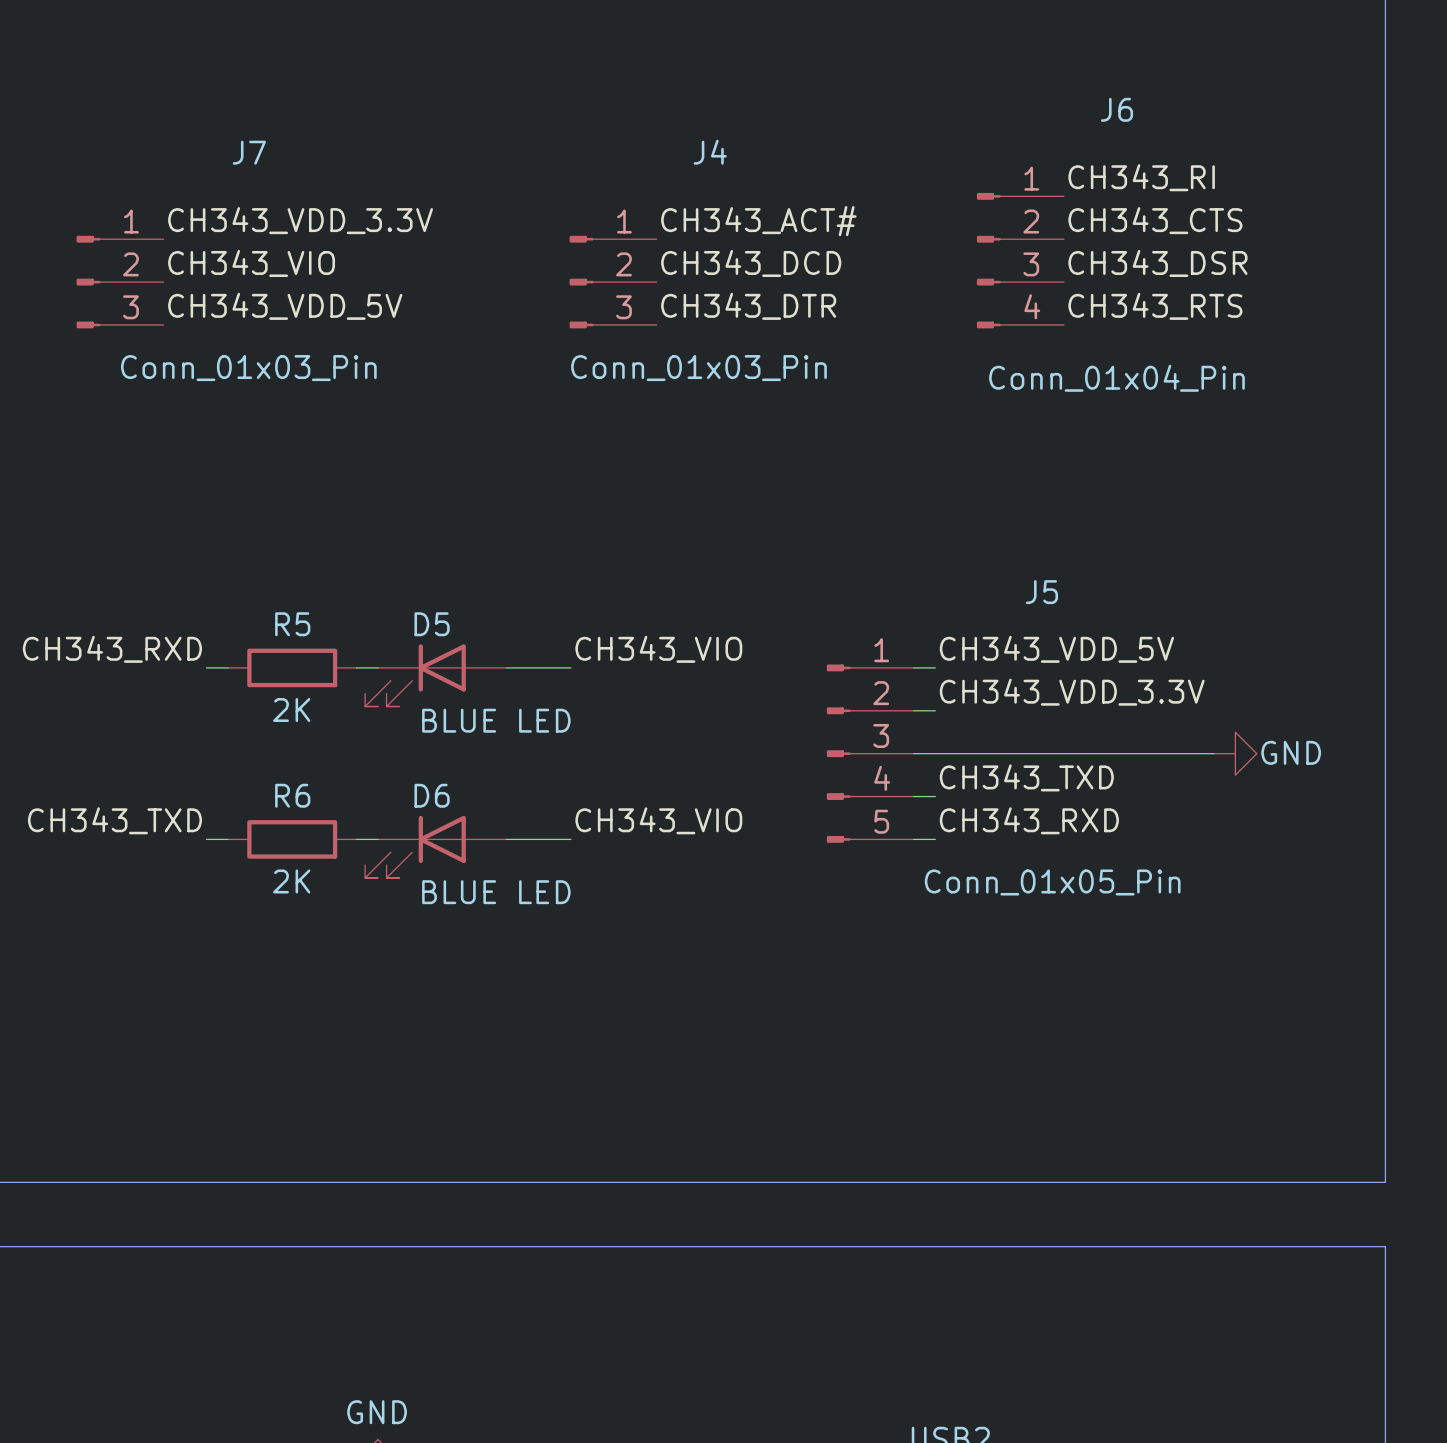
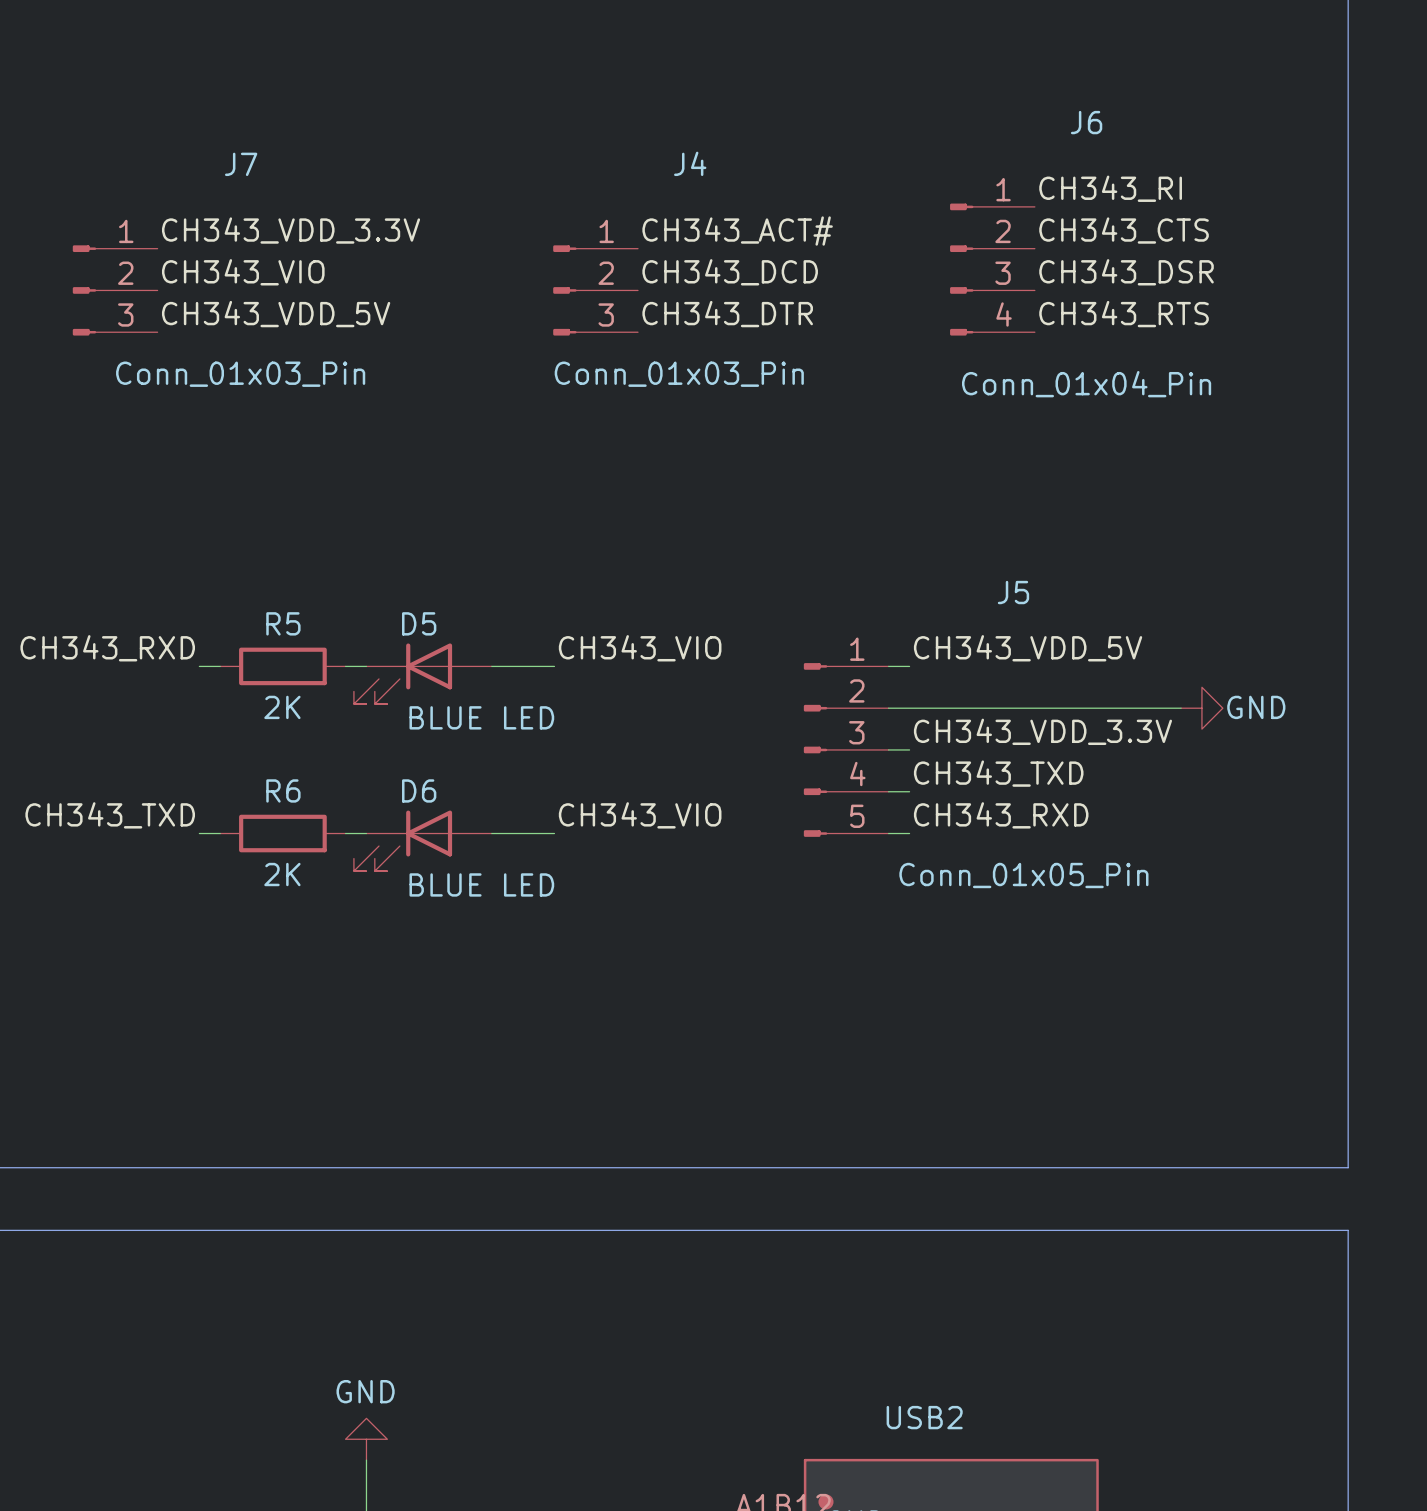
label position: CH343_VDD_3.3V (1072, 692) -> CH343_VDD_3.3V (1042, 731)
wire: (935, 753) (1213, 753) -> (909, 708) (1181, 708)
power symbol position: GND (1235, 753) -> GND (1201, 708)

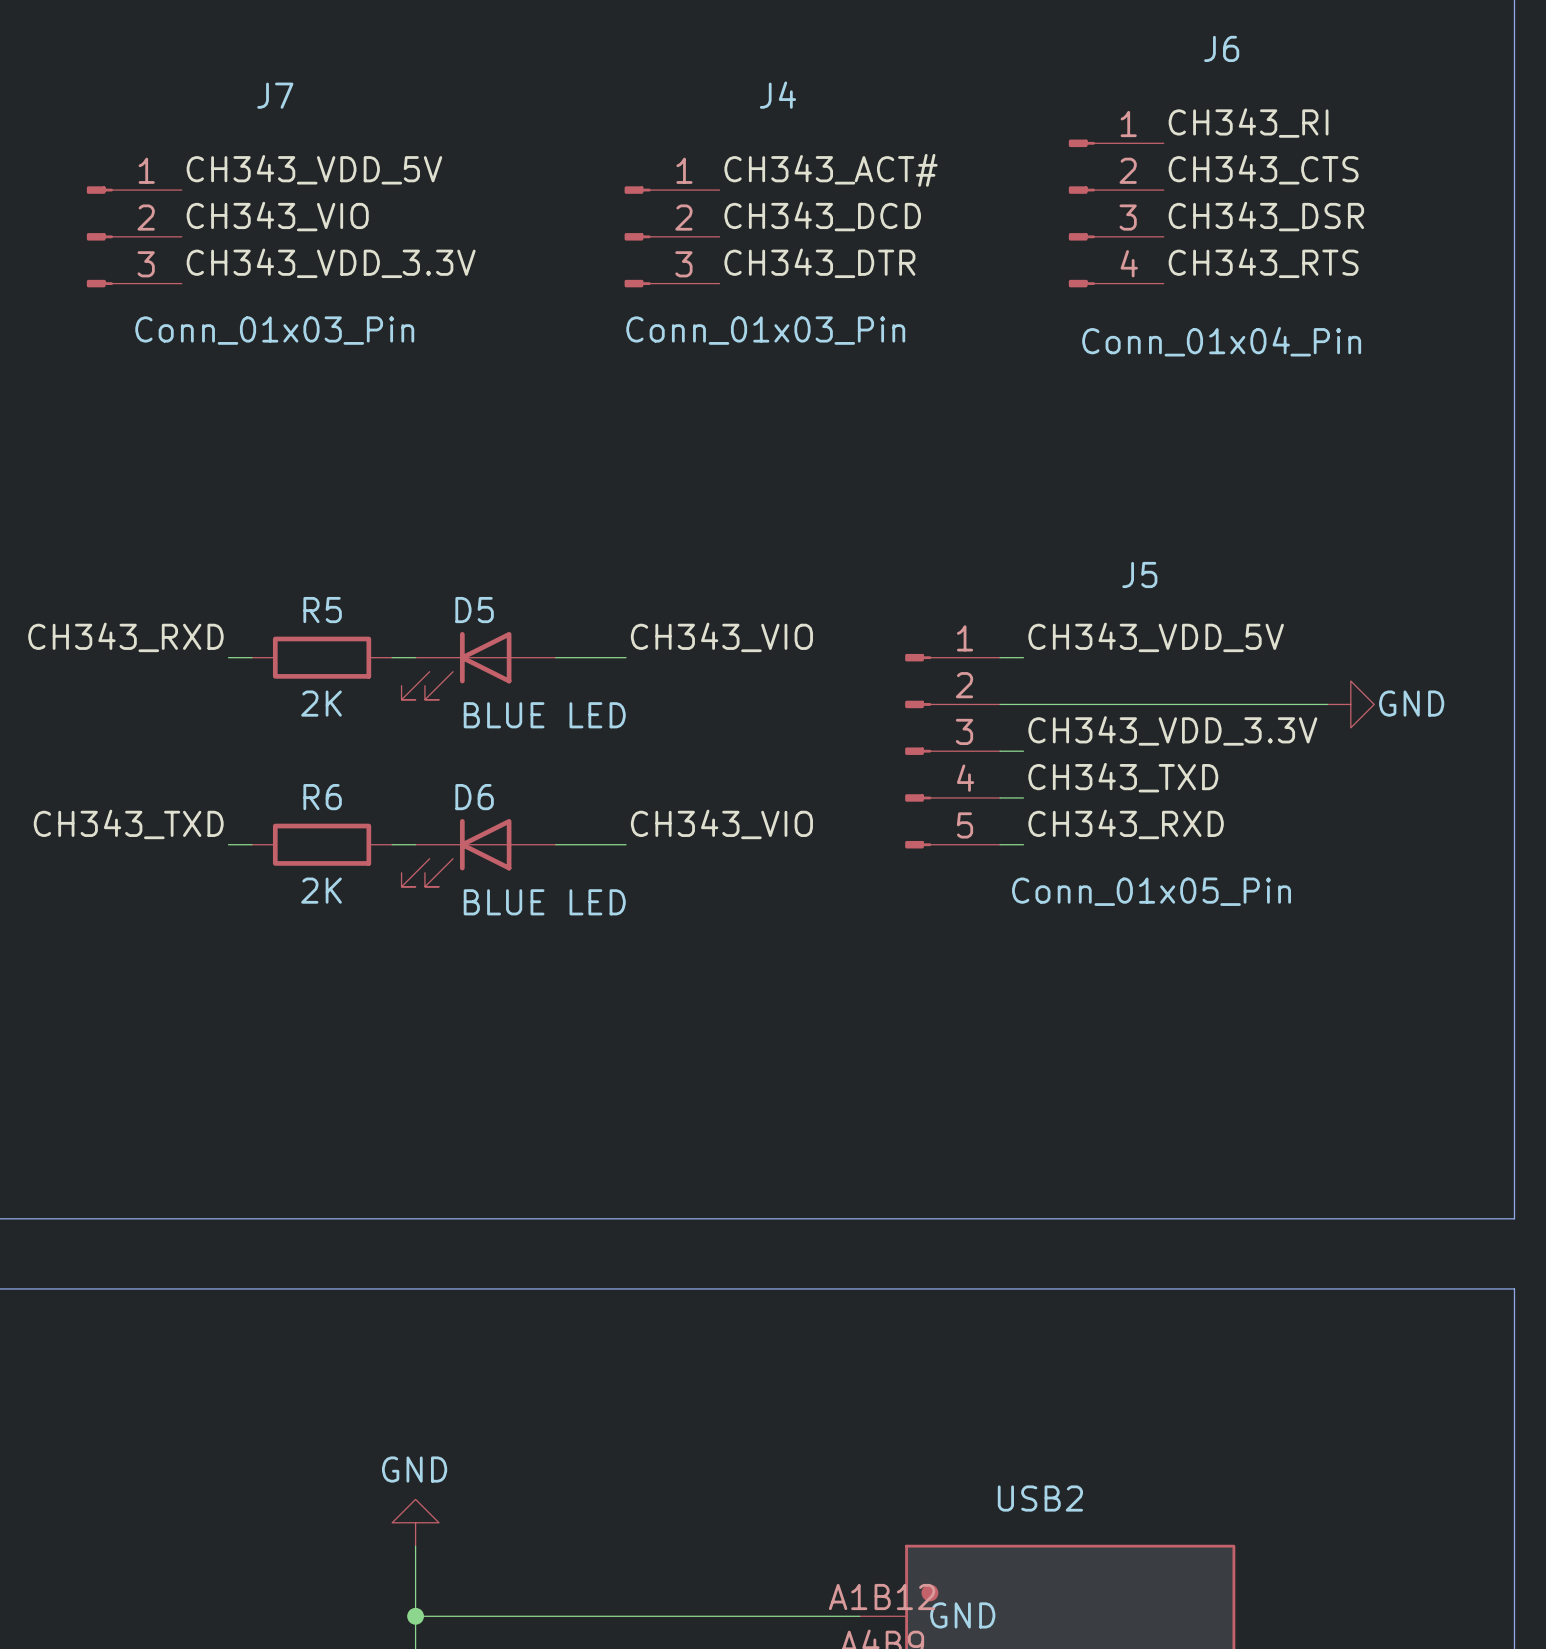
label: CH343_VDD_3.3V (291, 230) -> CH343_VDD_5V (314, 169)
label: CH343_VDD_5V (276, 314) -> CH343_VDD_3.3V (331, 263)

